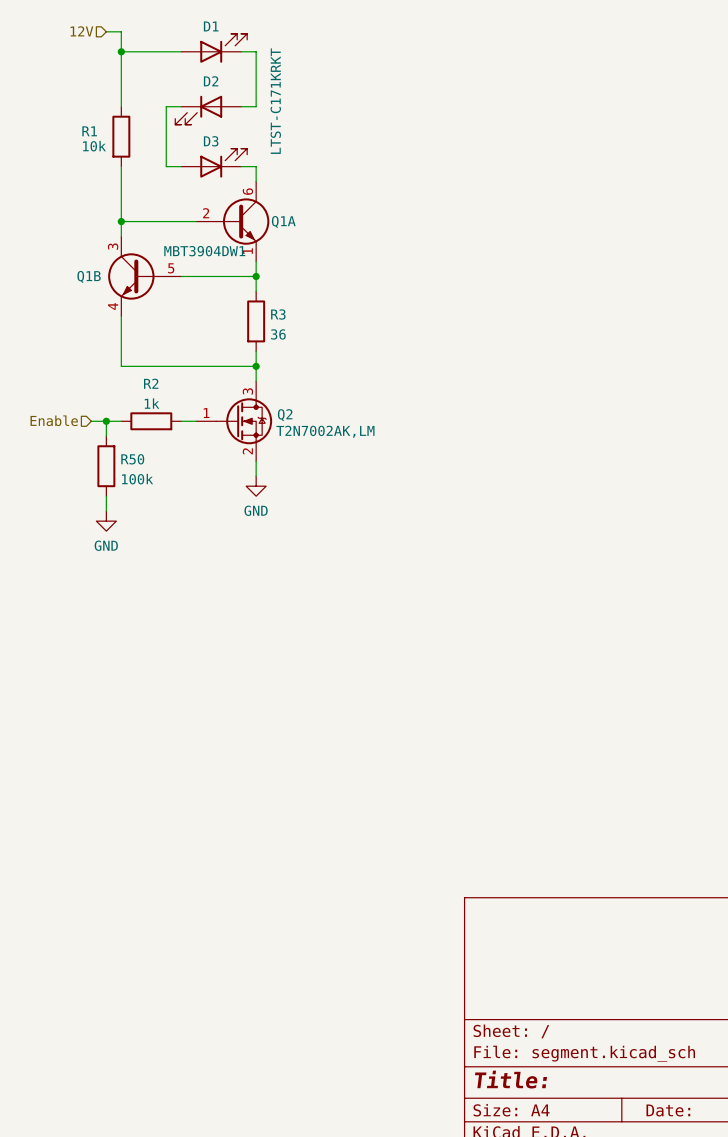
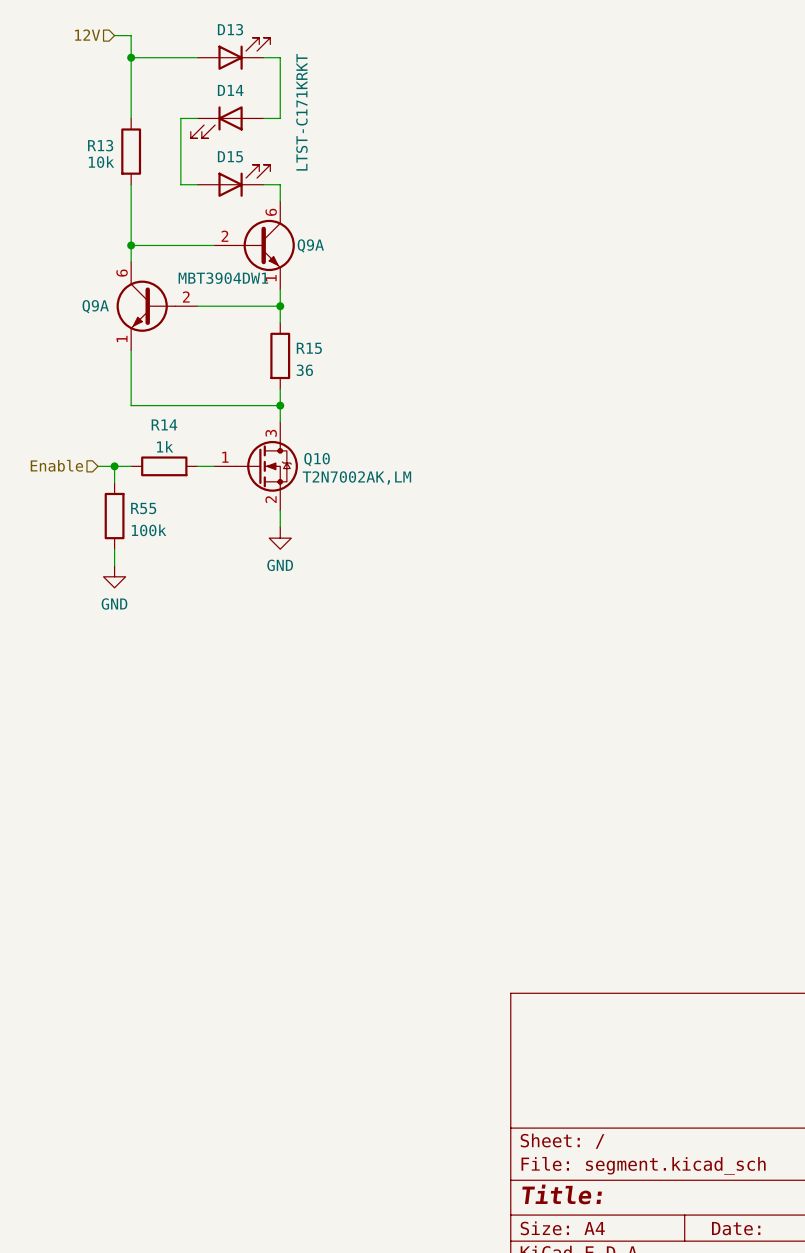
D1 name: D1 (211, 26) -> D13 (230, 29)
D2 name: D2 (211, 81) -> D14 (230, 90)
R1 name: R1 (89, 131) -> R13 (100, 145)
D3 name: D3 (211, 141) -> D15 (230, 156)
Q1A name: Q1A (283, 222) -> Q9A (310, 245)
Q1B pin number: 3 (113, 246) -> 6 (122, 273)
Q1B pin number: 5 (171, 268) -> 2 (186, 297)
Q1B name: Q1B (89, 276) -> Q9A (95, 306)
Q1B pin number: 4 (113, 306) -> 1 (122, 338)
R3 name: R3 (278, 314) -> R15 (309, 348)
R2 name: R2 (151, 383) -> R14 (164, 424)
Q2 name: Q2 (285, 415) -> Q10 (317, 459)
R50 name: R50 (132, 459) -> R55 (143, 508)

